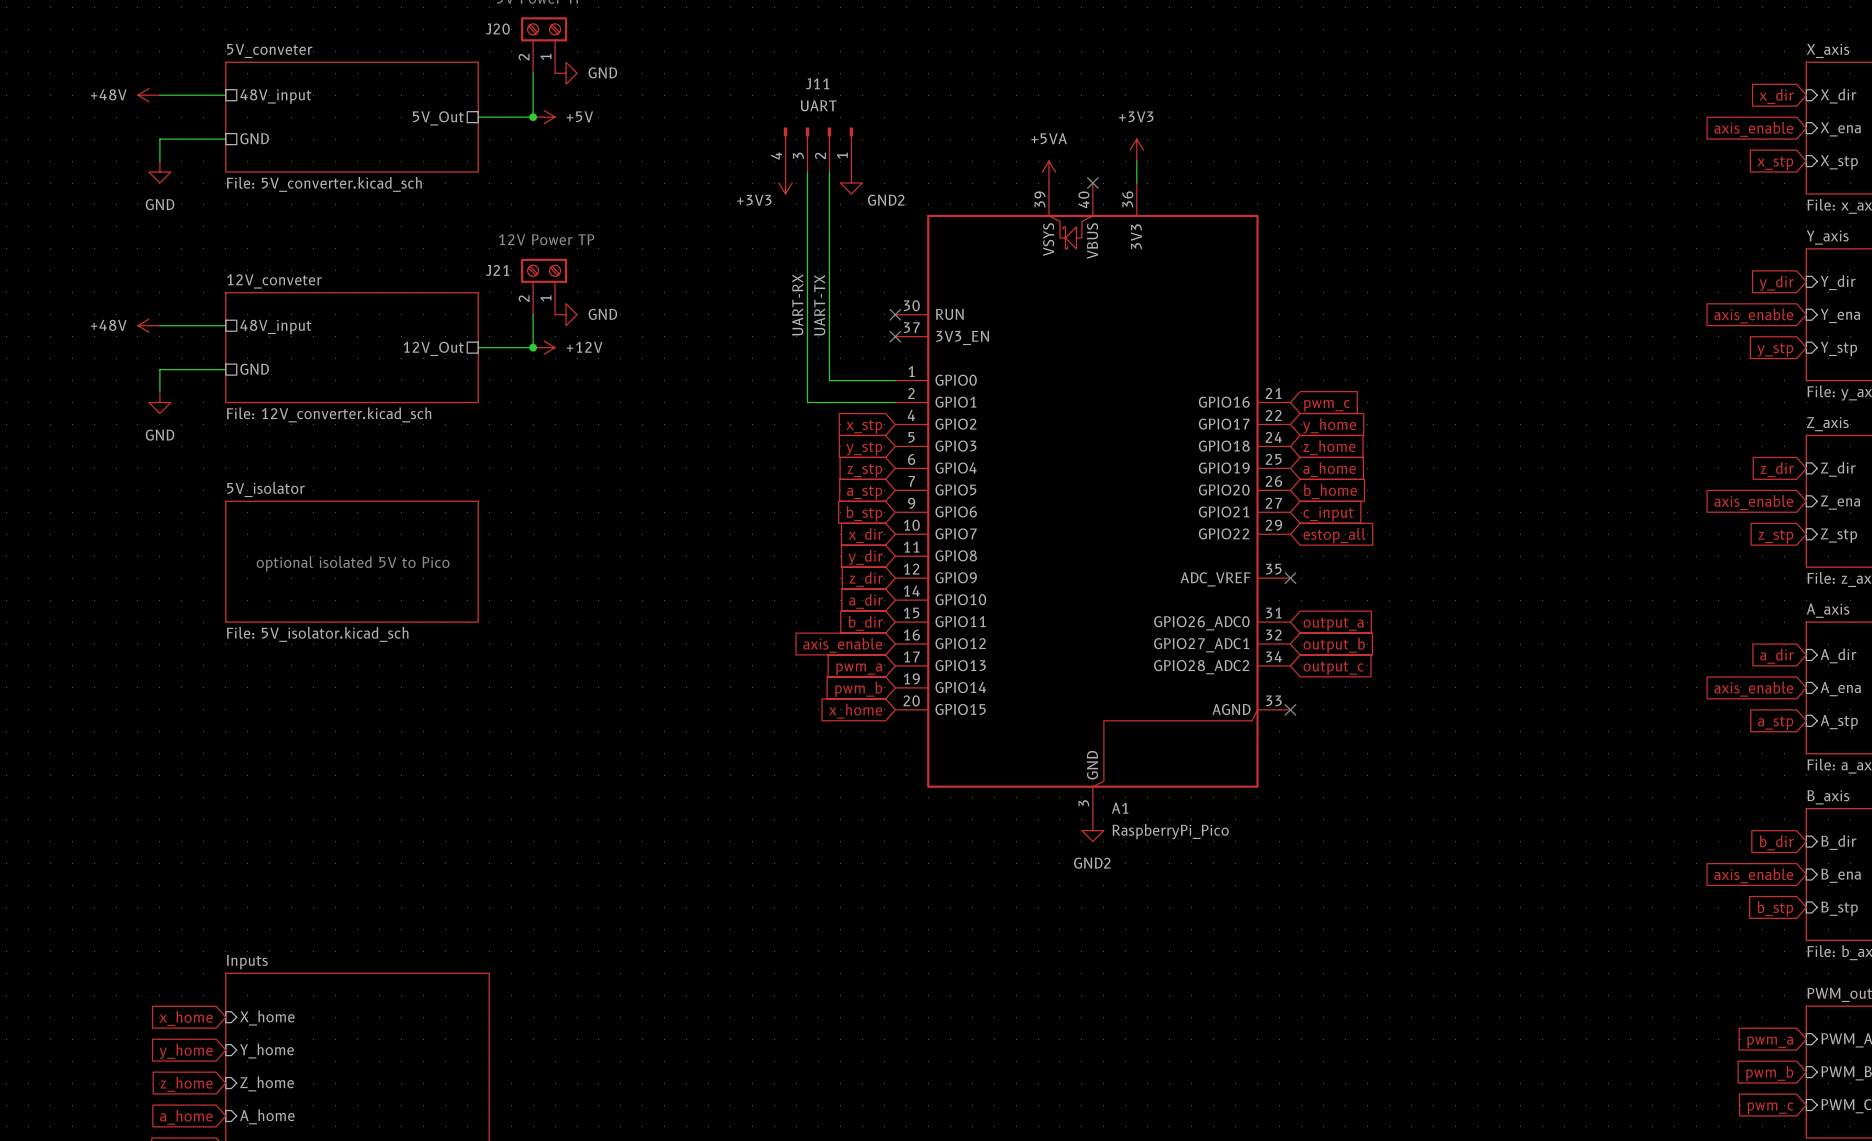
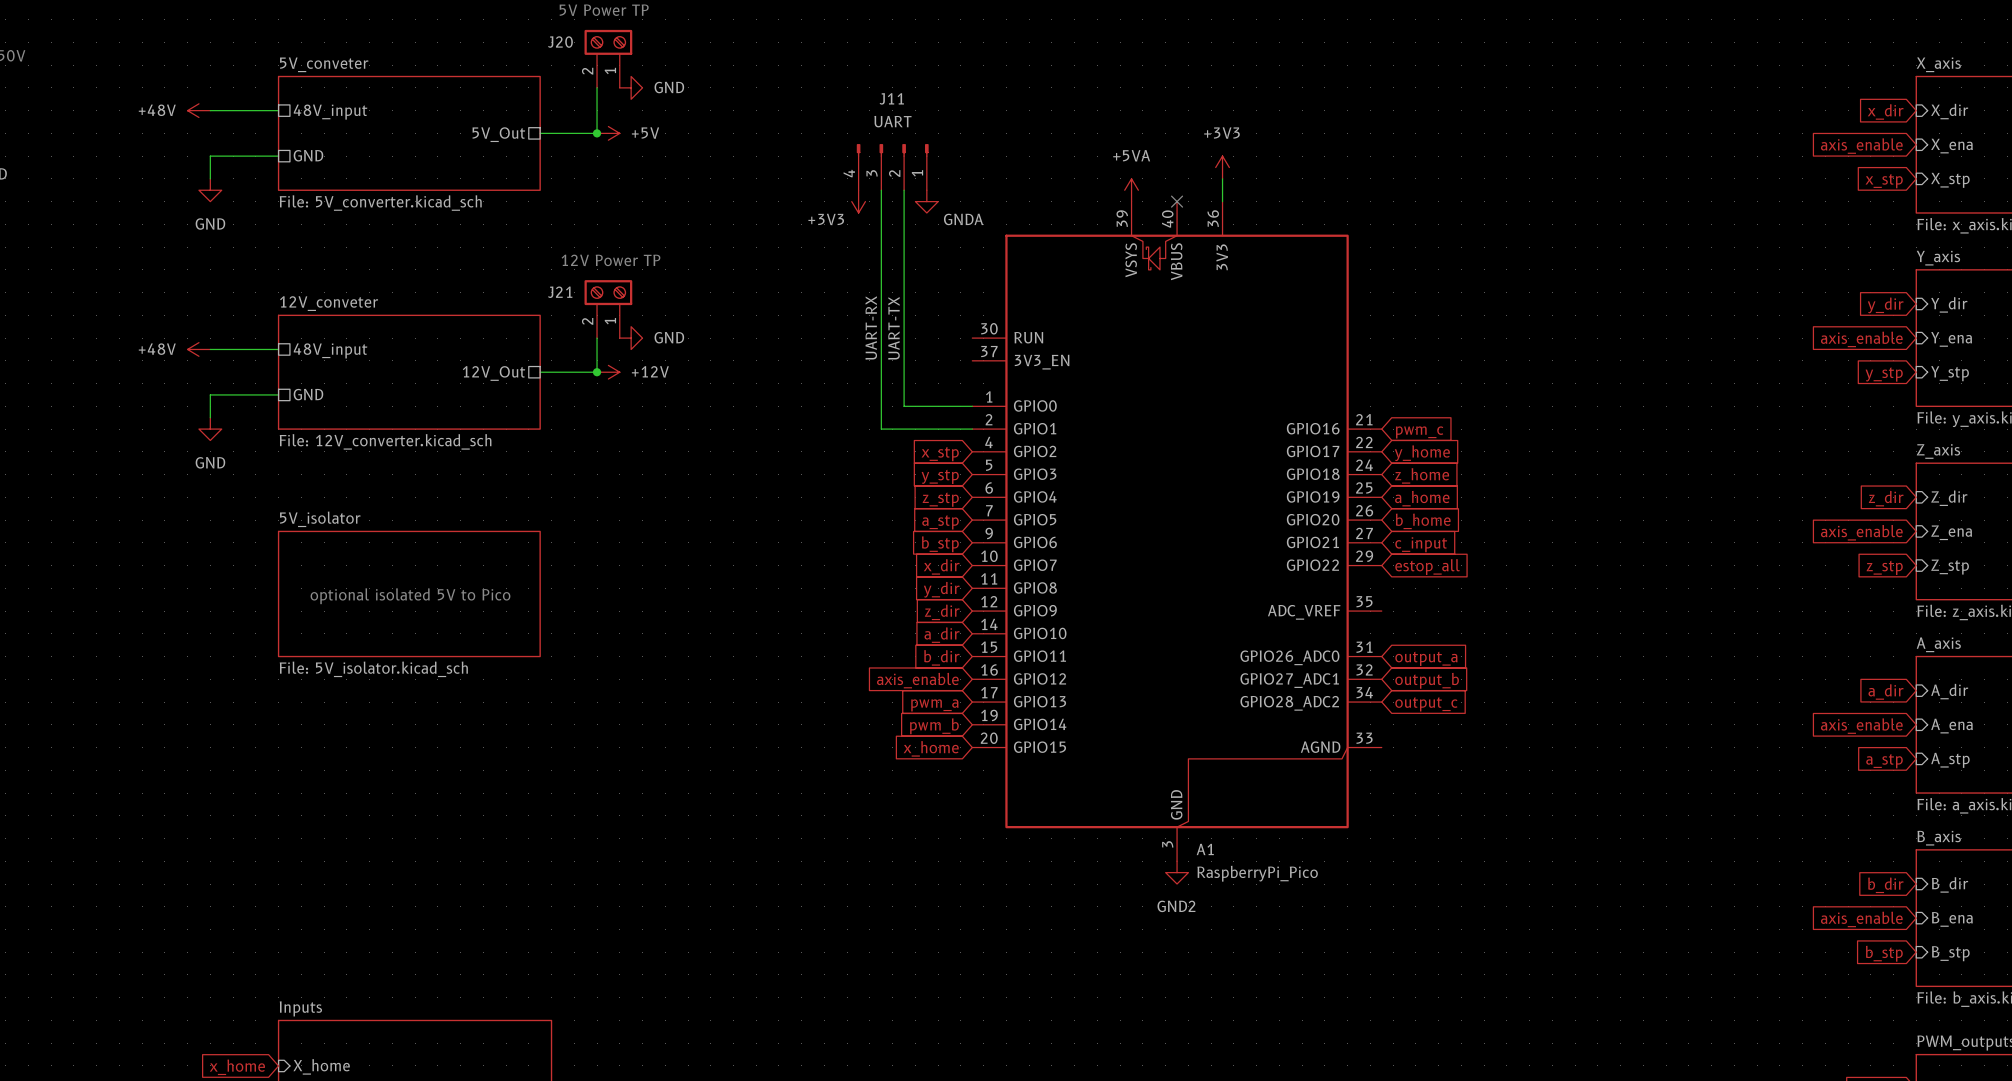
power symbol: GND2 (851, 183) -> GNDA (926, 201)
no-connect mark: (895, 314) -> none
no-connect mark: (895, 336) -> none
no-connect mark: (1290, 578) -> none
no-connect mark: (1290, 709) -> none

